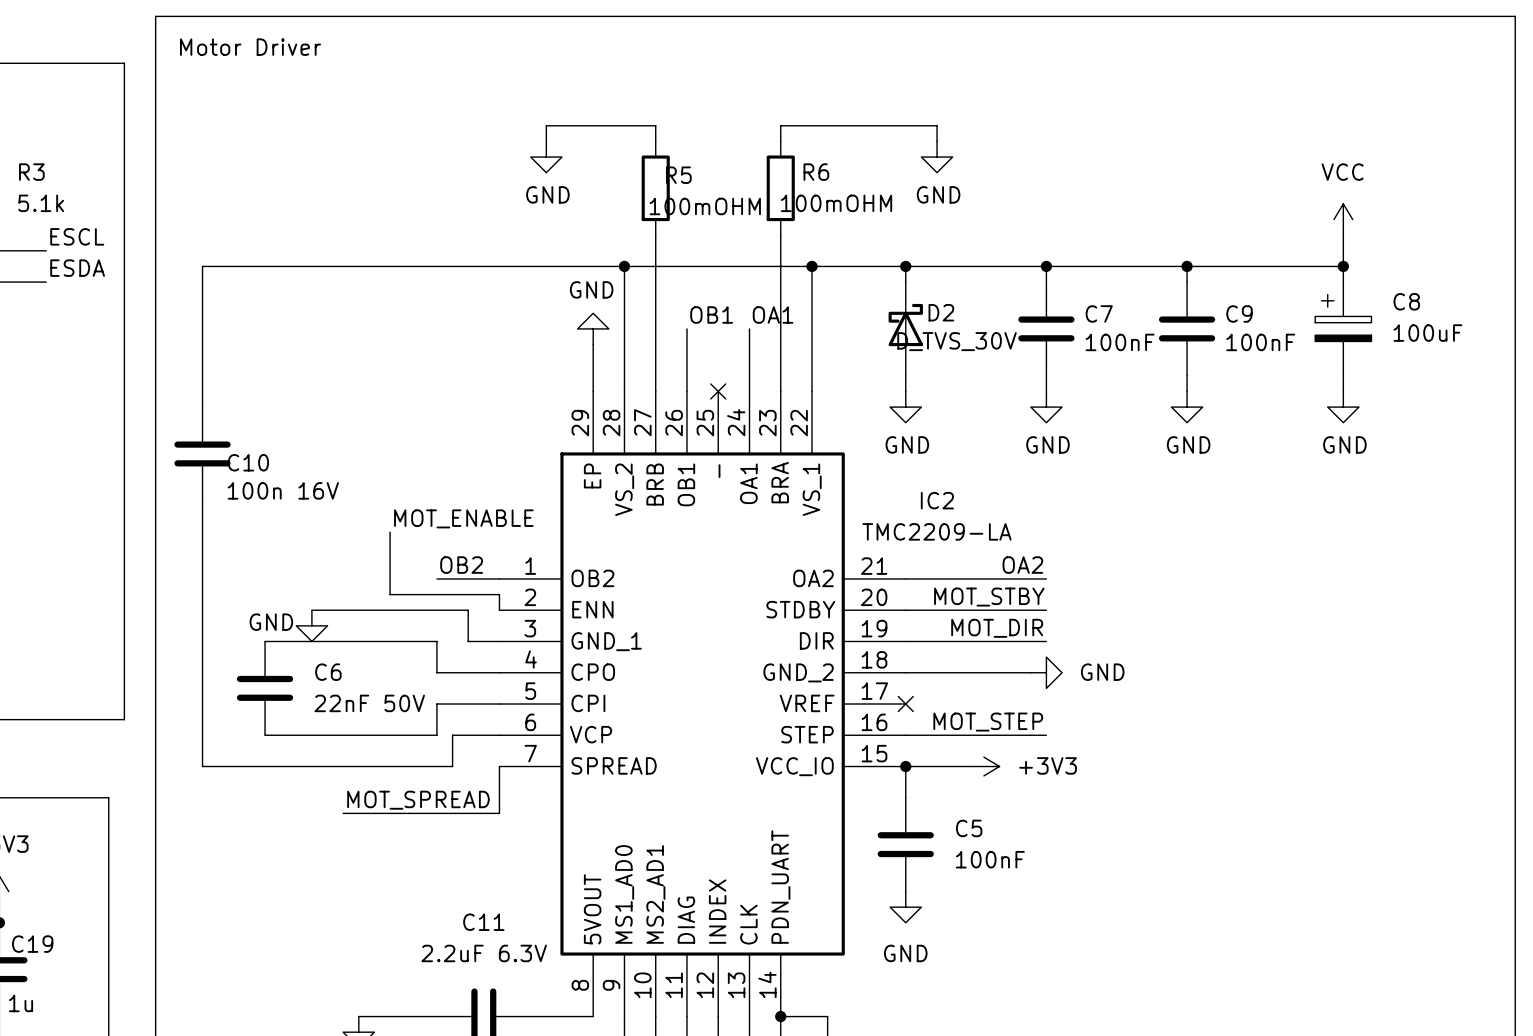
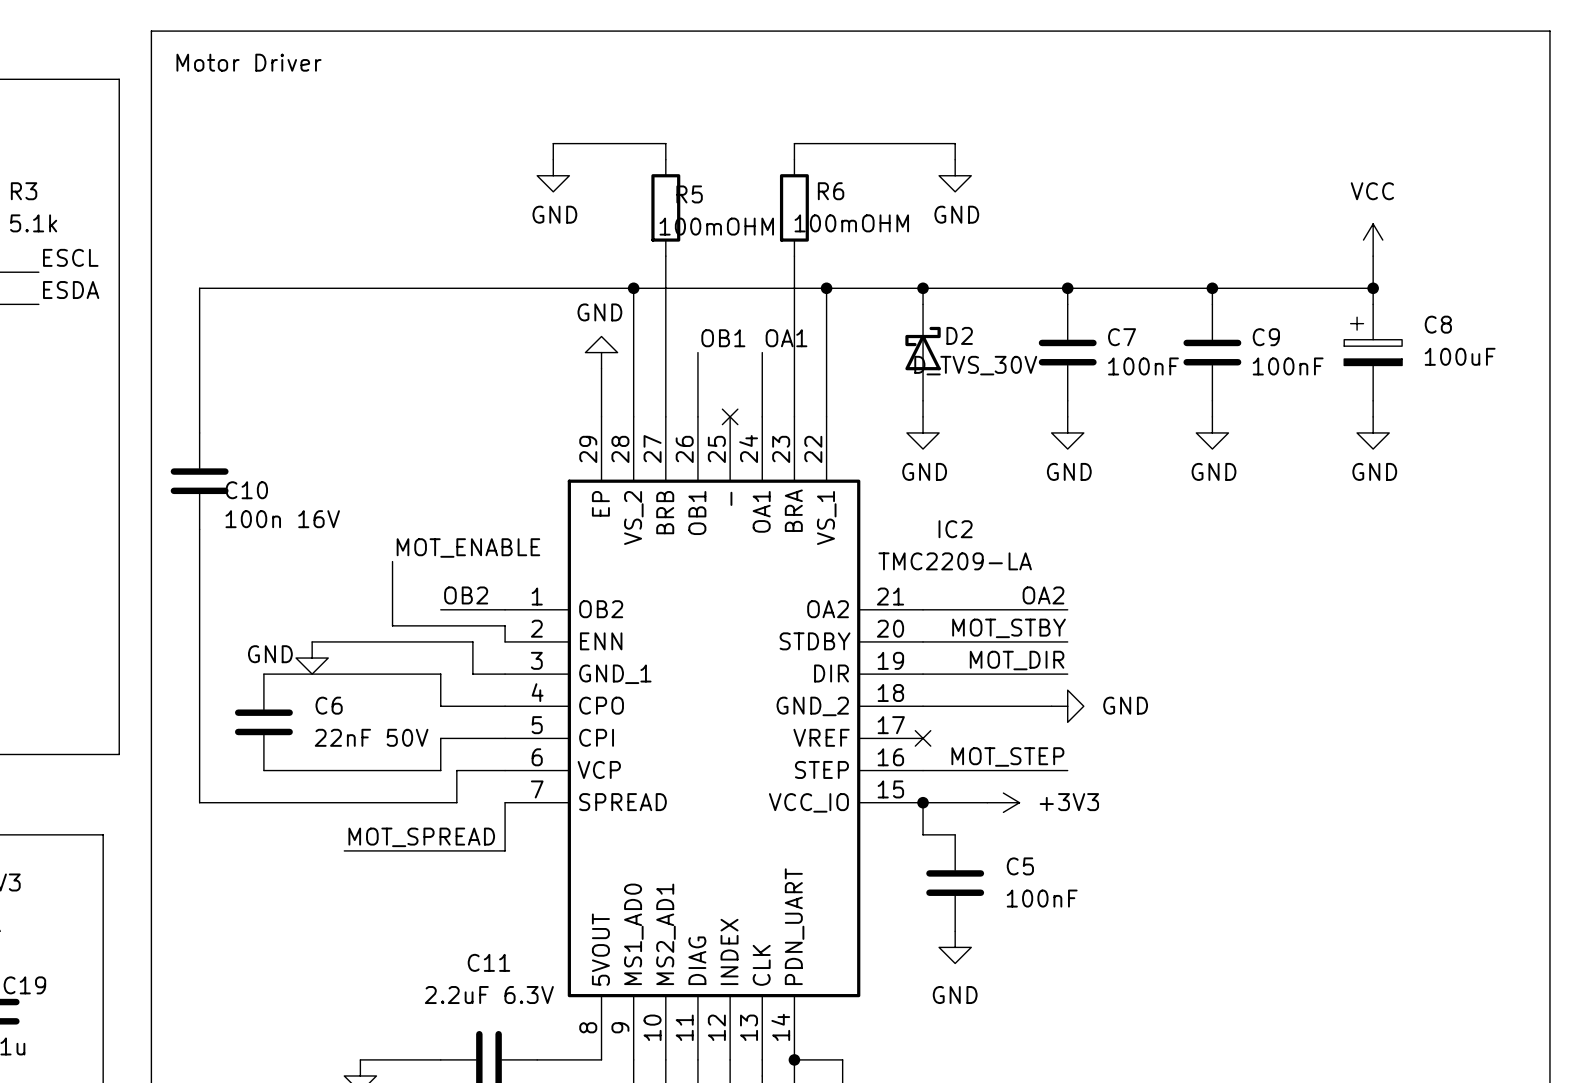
wire: none -> (923, 834) (955, 834)
C5 position: (905, 844) -> (955, 883)
power symbol position: GND (905, 907) -> GND (955, 947)

